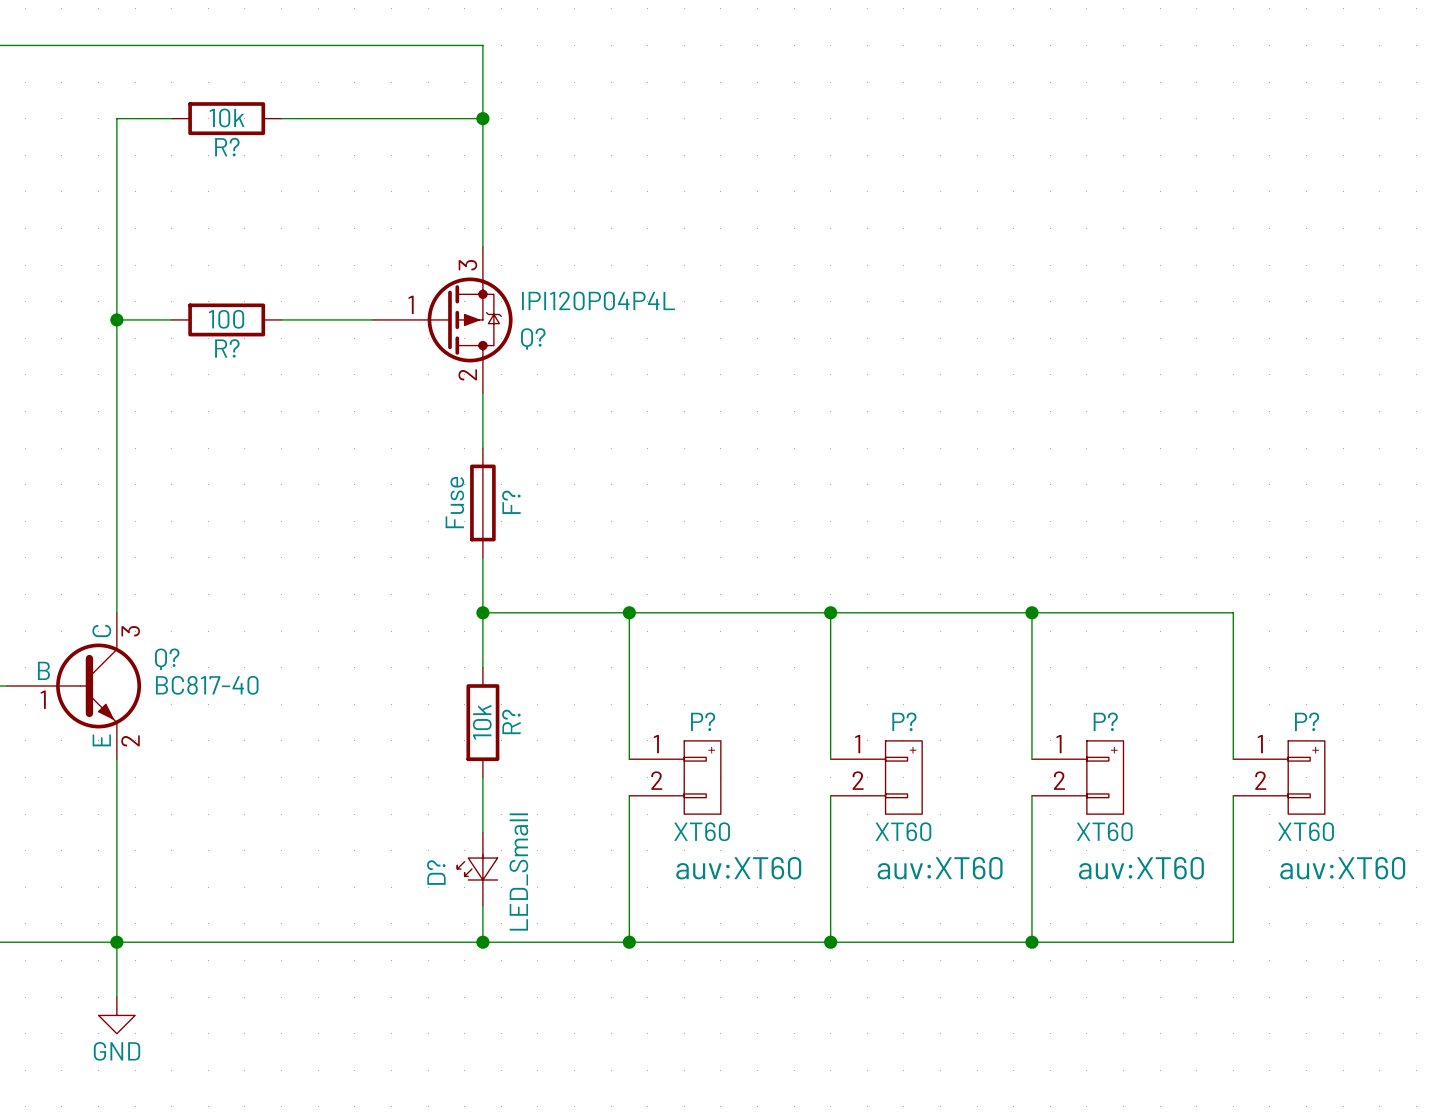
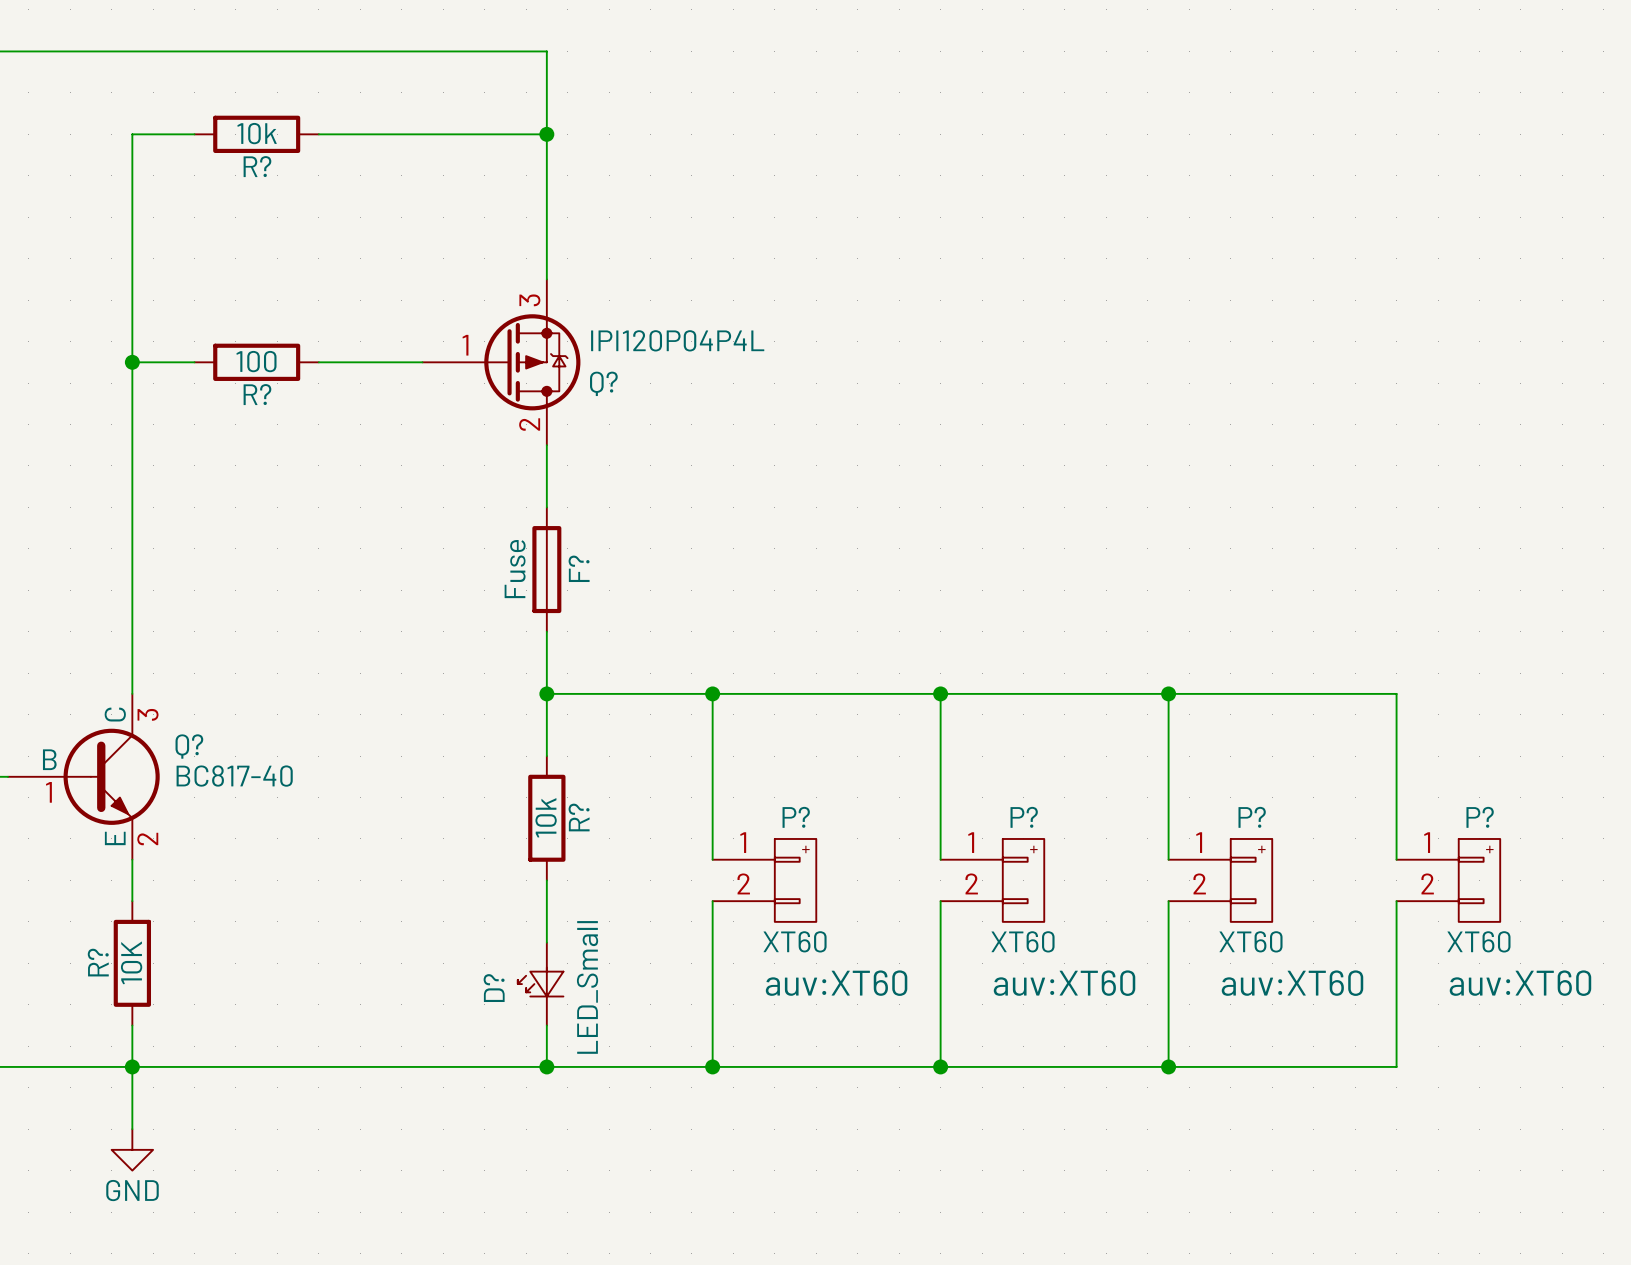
wire: (116, 795) (116, 905) -> none
R?: none -> 10K (132, 963)

